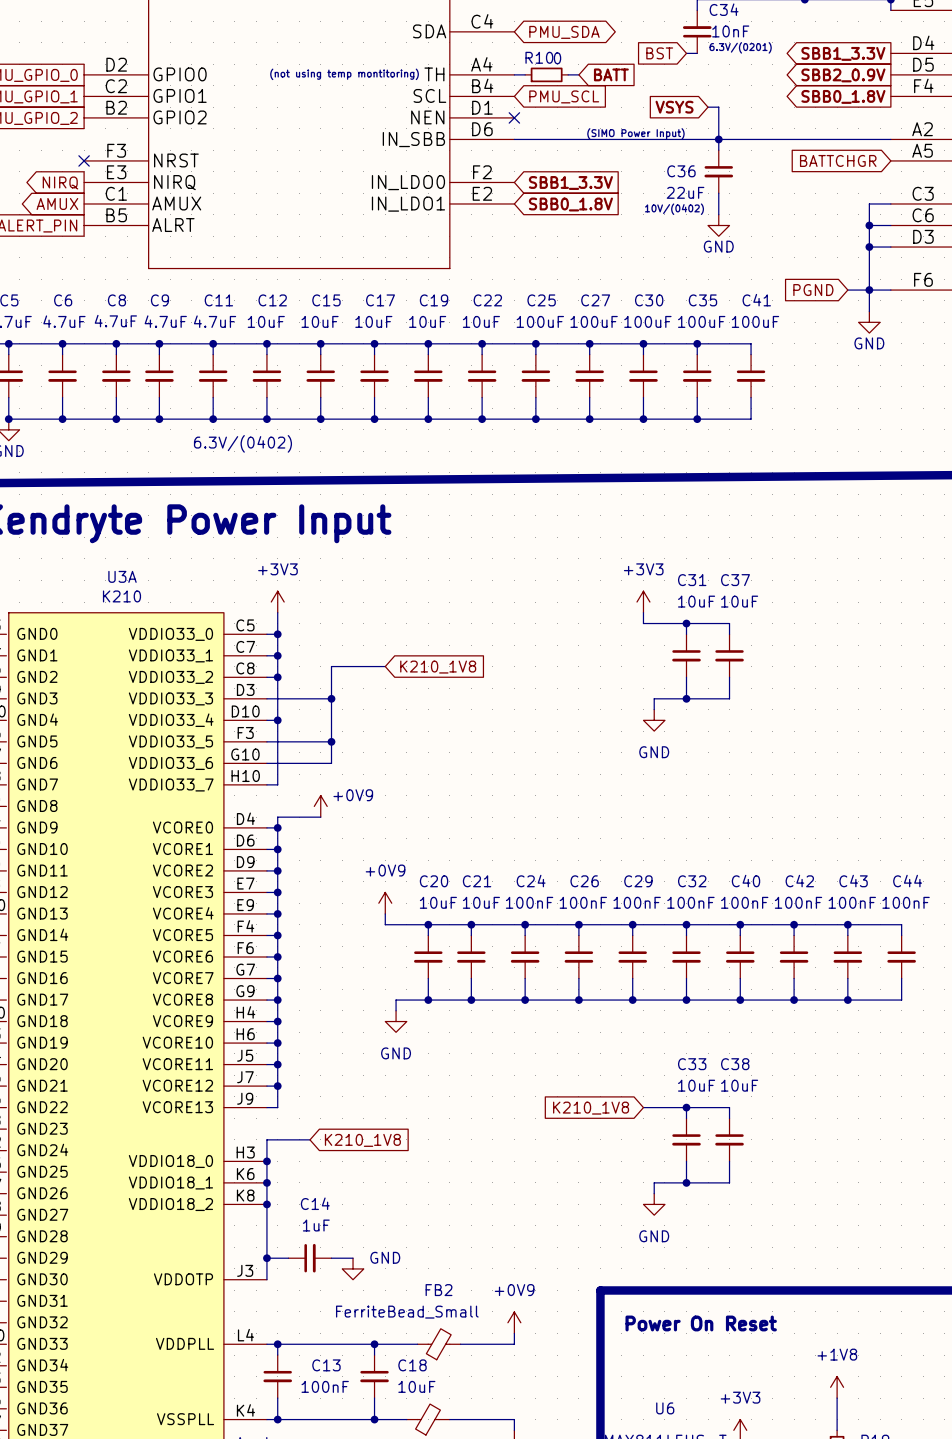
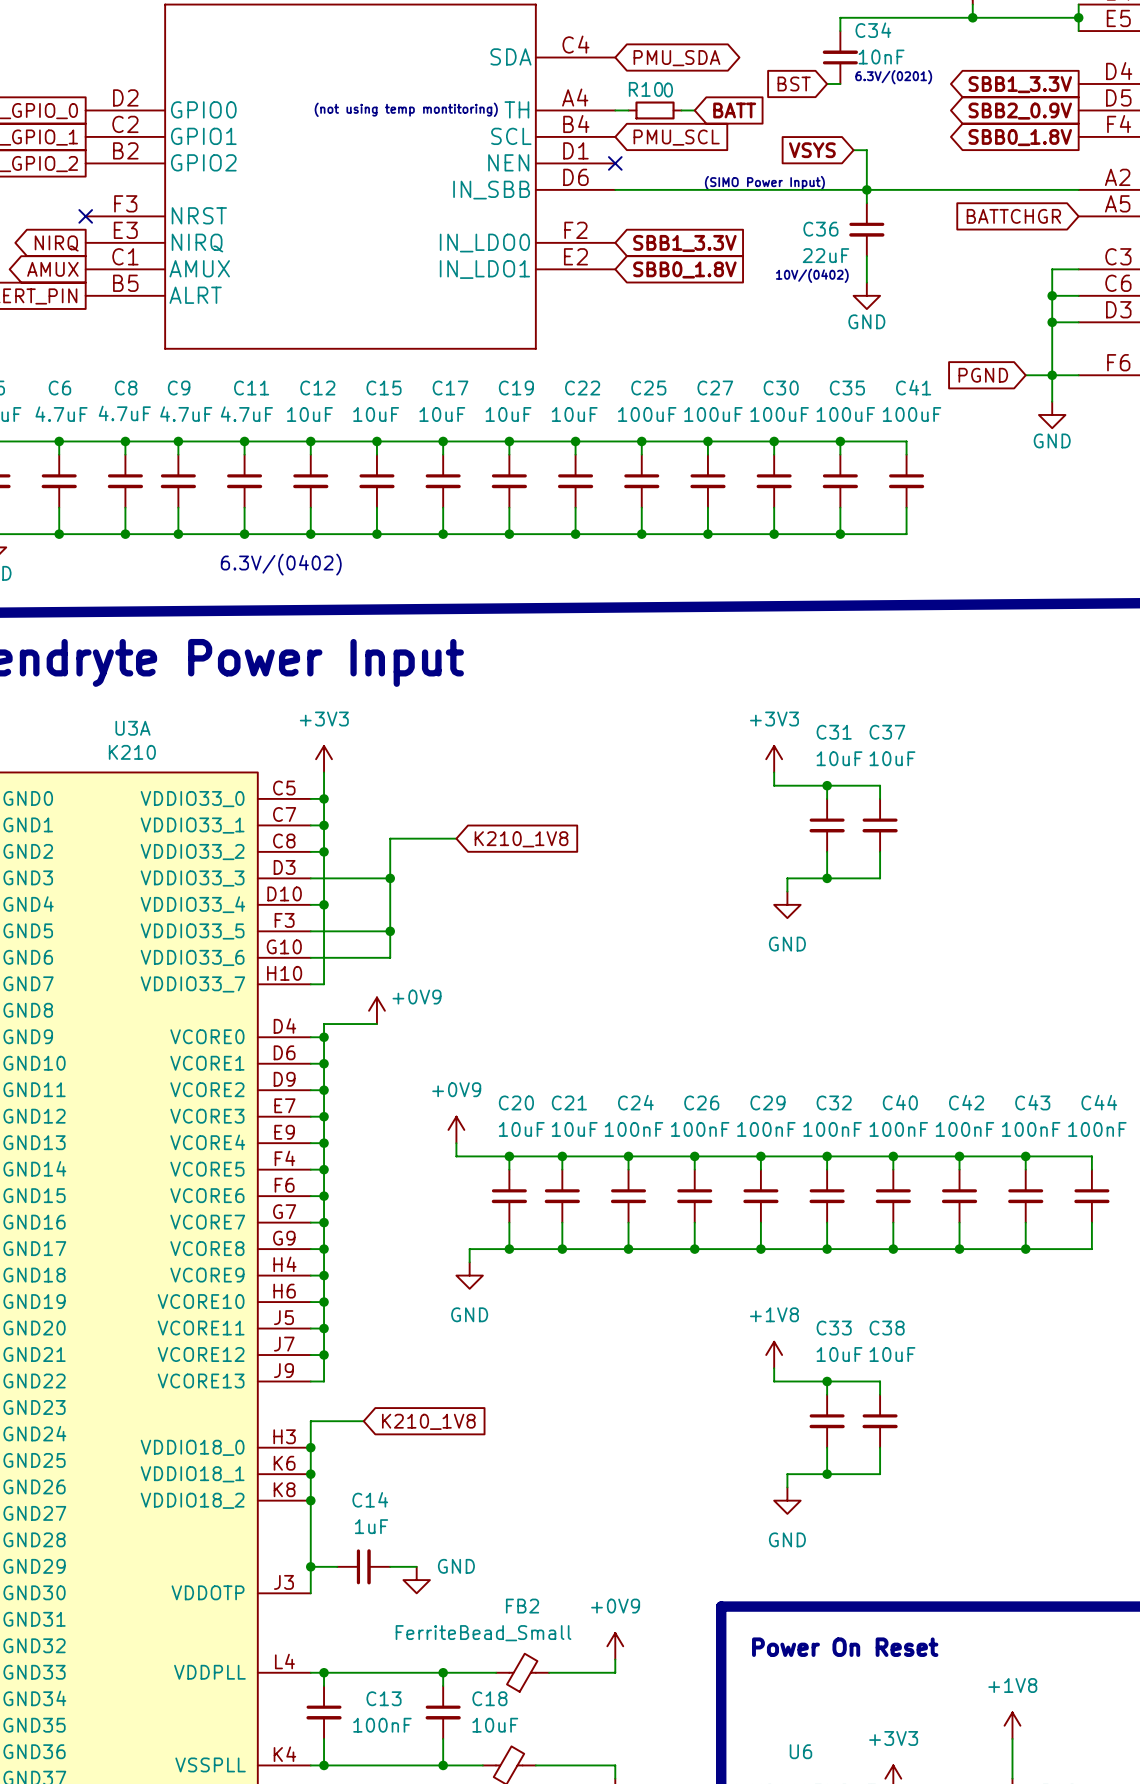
power symbol: none -> +1V8 (774, 1355)
wire: none -> (774, 1368) (774, 1381)
global label: K210_1V8 (591, 1108) -> none

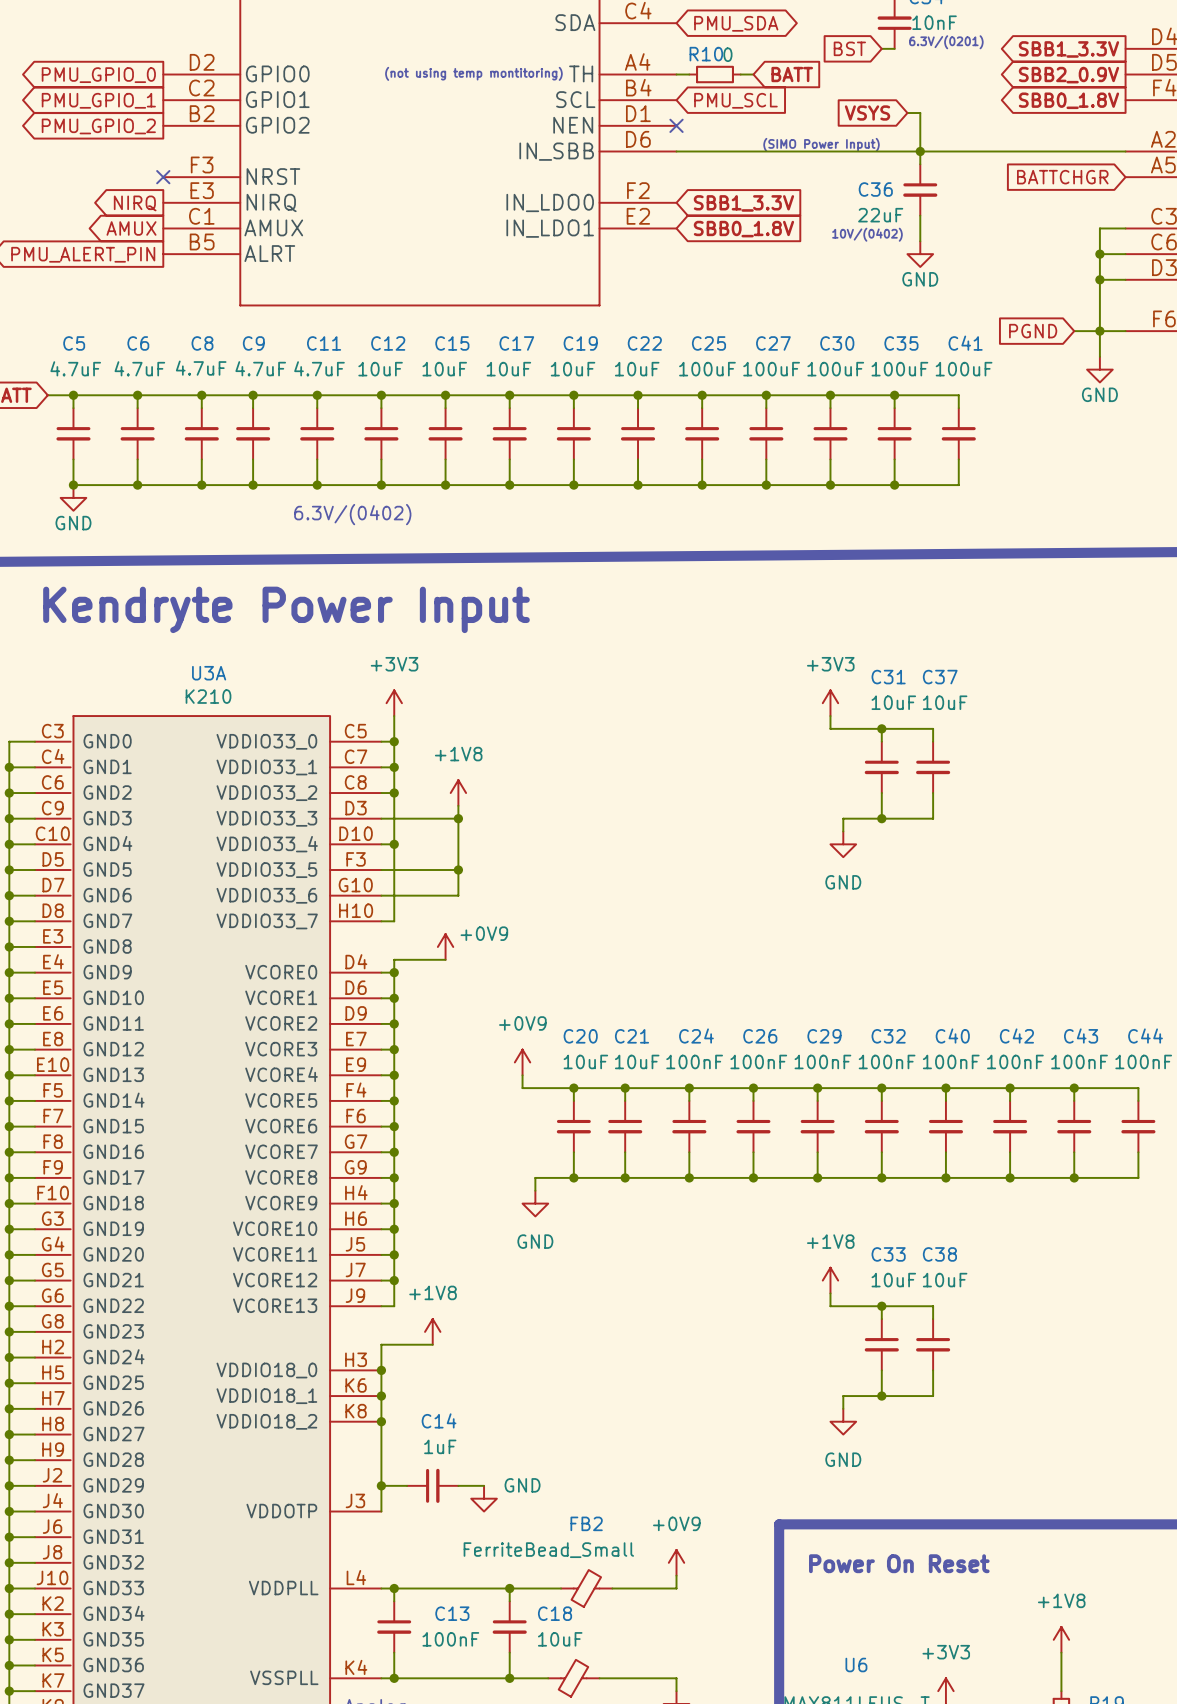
wire: (456, 838) (390, 838) (390, 865) -> none
global label: K210_1V8 (521, 839) -> none
power symbol: none -> +1V8 (458, 793)
power symbol: none -> +1V8 (432, 1331)
global label: K210_1V8 (428, 1421) -> none

